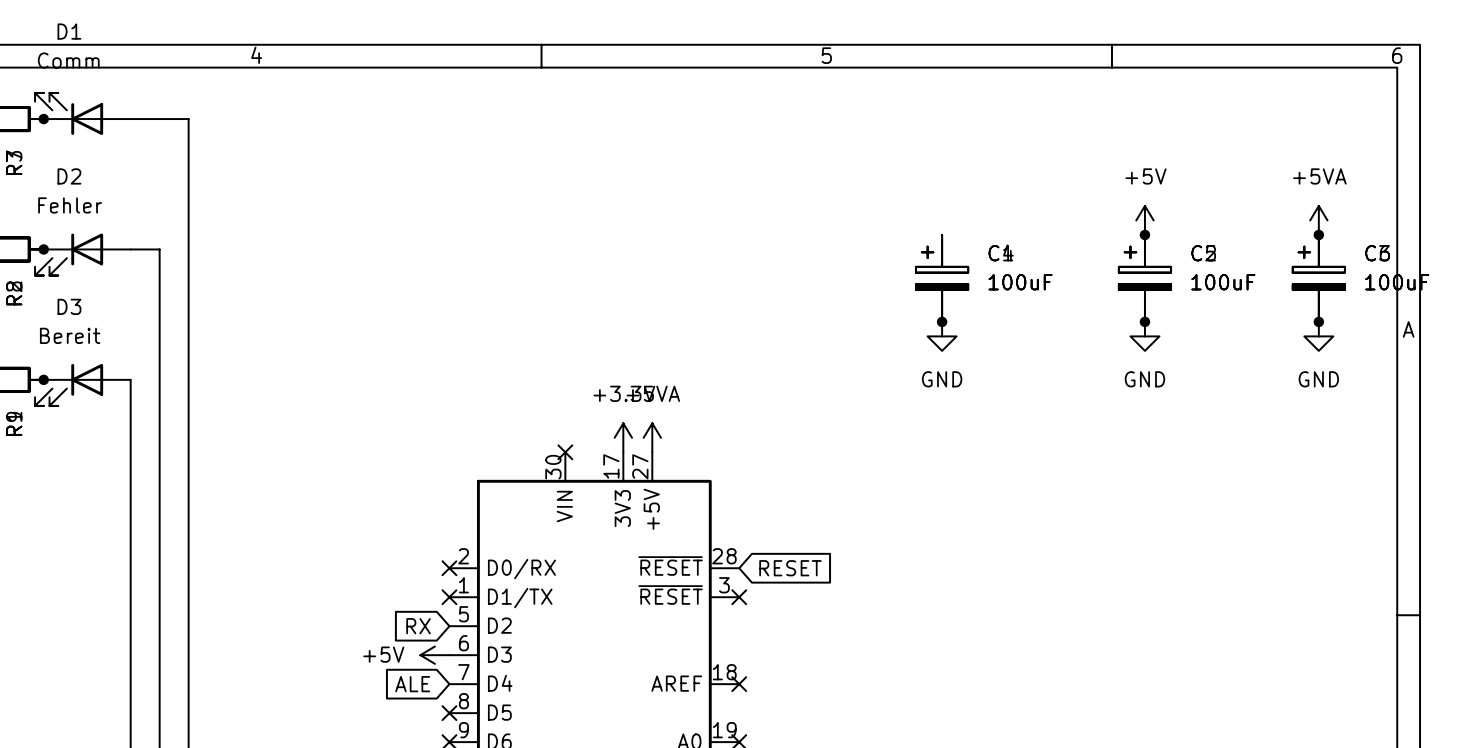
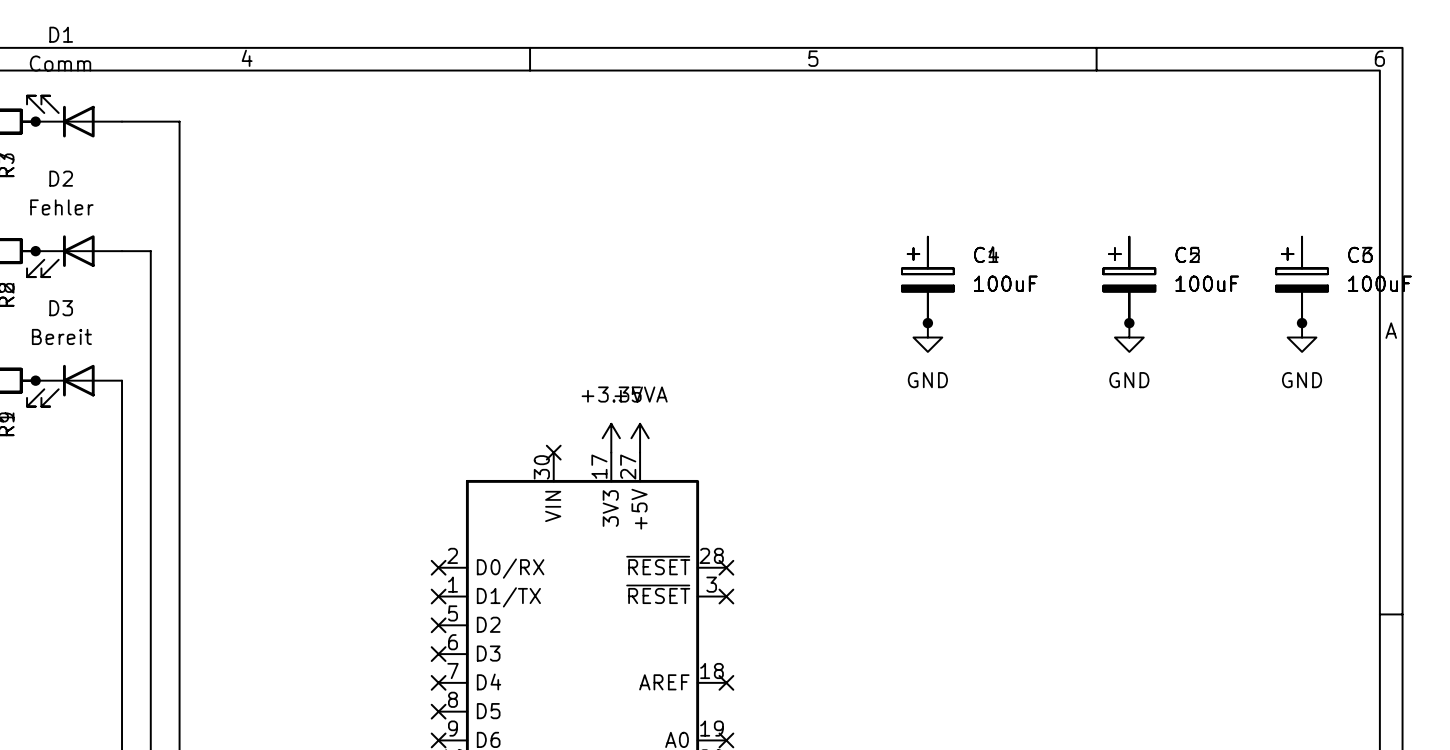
power symbol: +5V (1144, 220) -> none
power symbol: +5VA (1318, 220) -> none
junction: (1144, 234) -> none
junction: (1318, 234) -> none
no-connect mark: none -> (726, 567)
global label: RESET (790, 568) -> none
global label: RX (418, 626) -> none
no-connect mark: none -> (438, 625)
power symbol: +5V (434, 655) -> none
no-connect mark: none -> (438, 654)
global label: ALE (412, 684) -> none
no-connect mark: none -> (438, 682)

